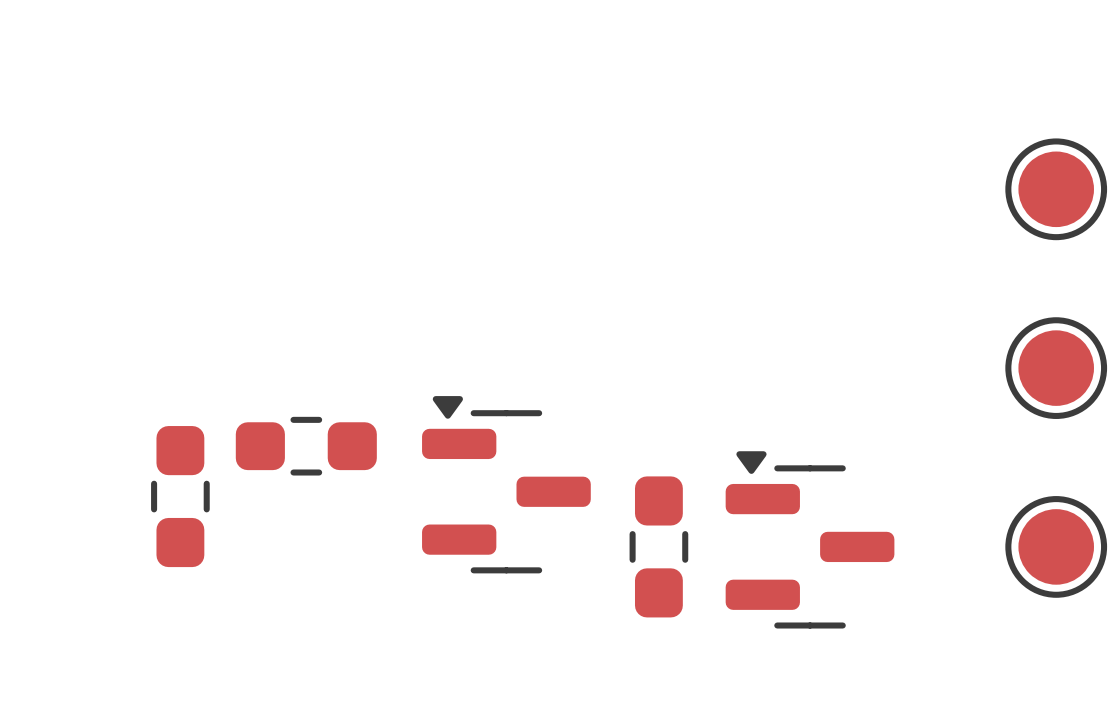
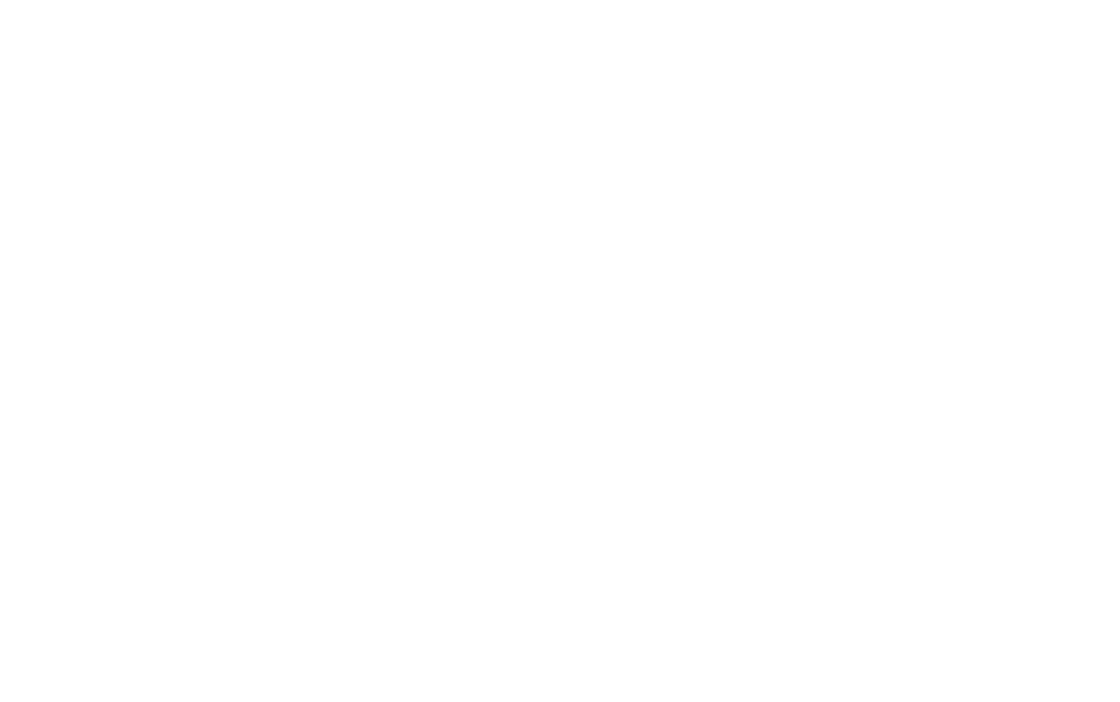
part: (1056, 189) -> none
part: (1056, 368) -> none
part: (306, 446) -> none
part: (506, 484) -> none
part: (180, 496) -> none
part: (810, 539) -> none
part: (658, 546) -> none
part: (1056, 546) -> none

